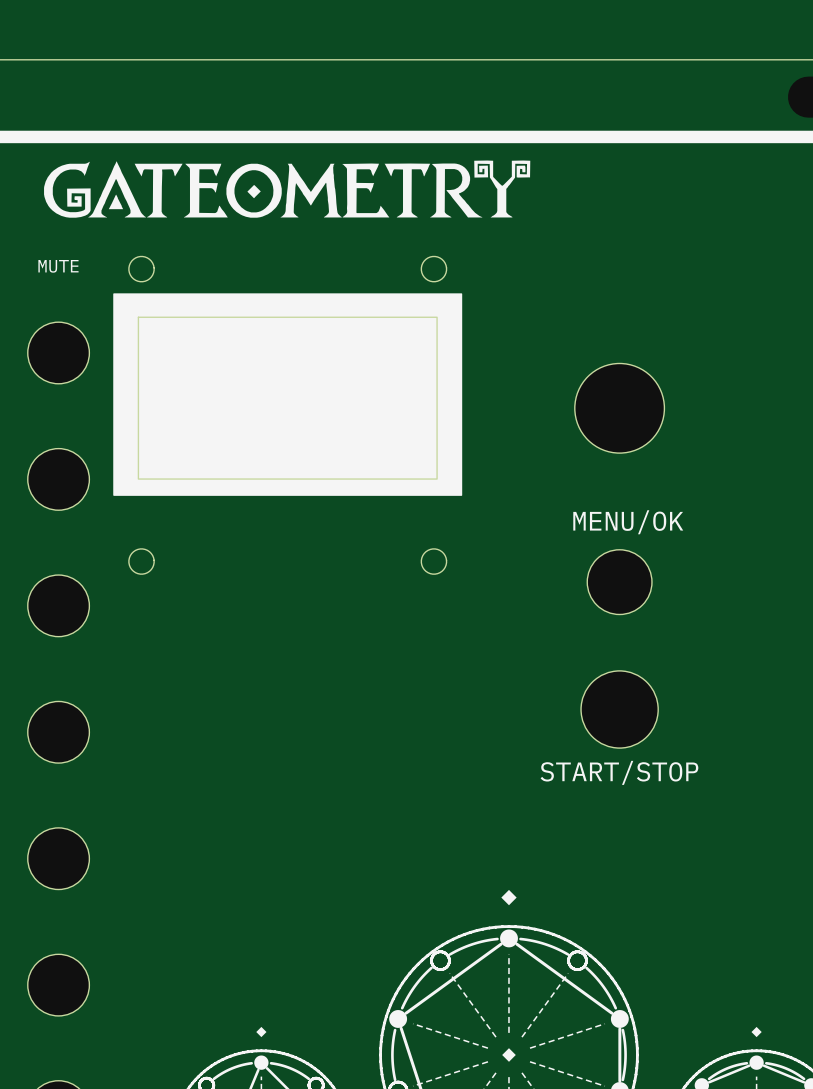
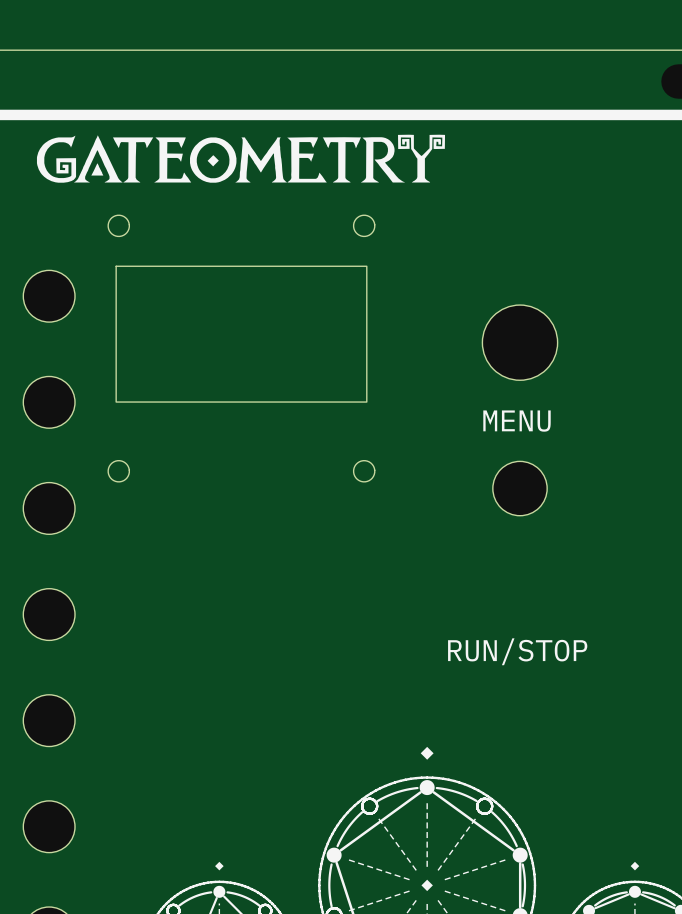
text: MUTE (58, 266) -> none
drawing: [113, 293, 463, 496] -> none
text: MENU/OK (628, 522) -> MENU (517, 421)
part: (619, 709) -> none
text: START/STOP (619, 772) -> RUN/STOP (517, 651)

